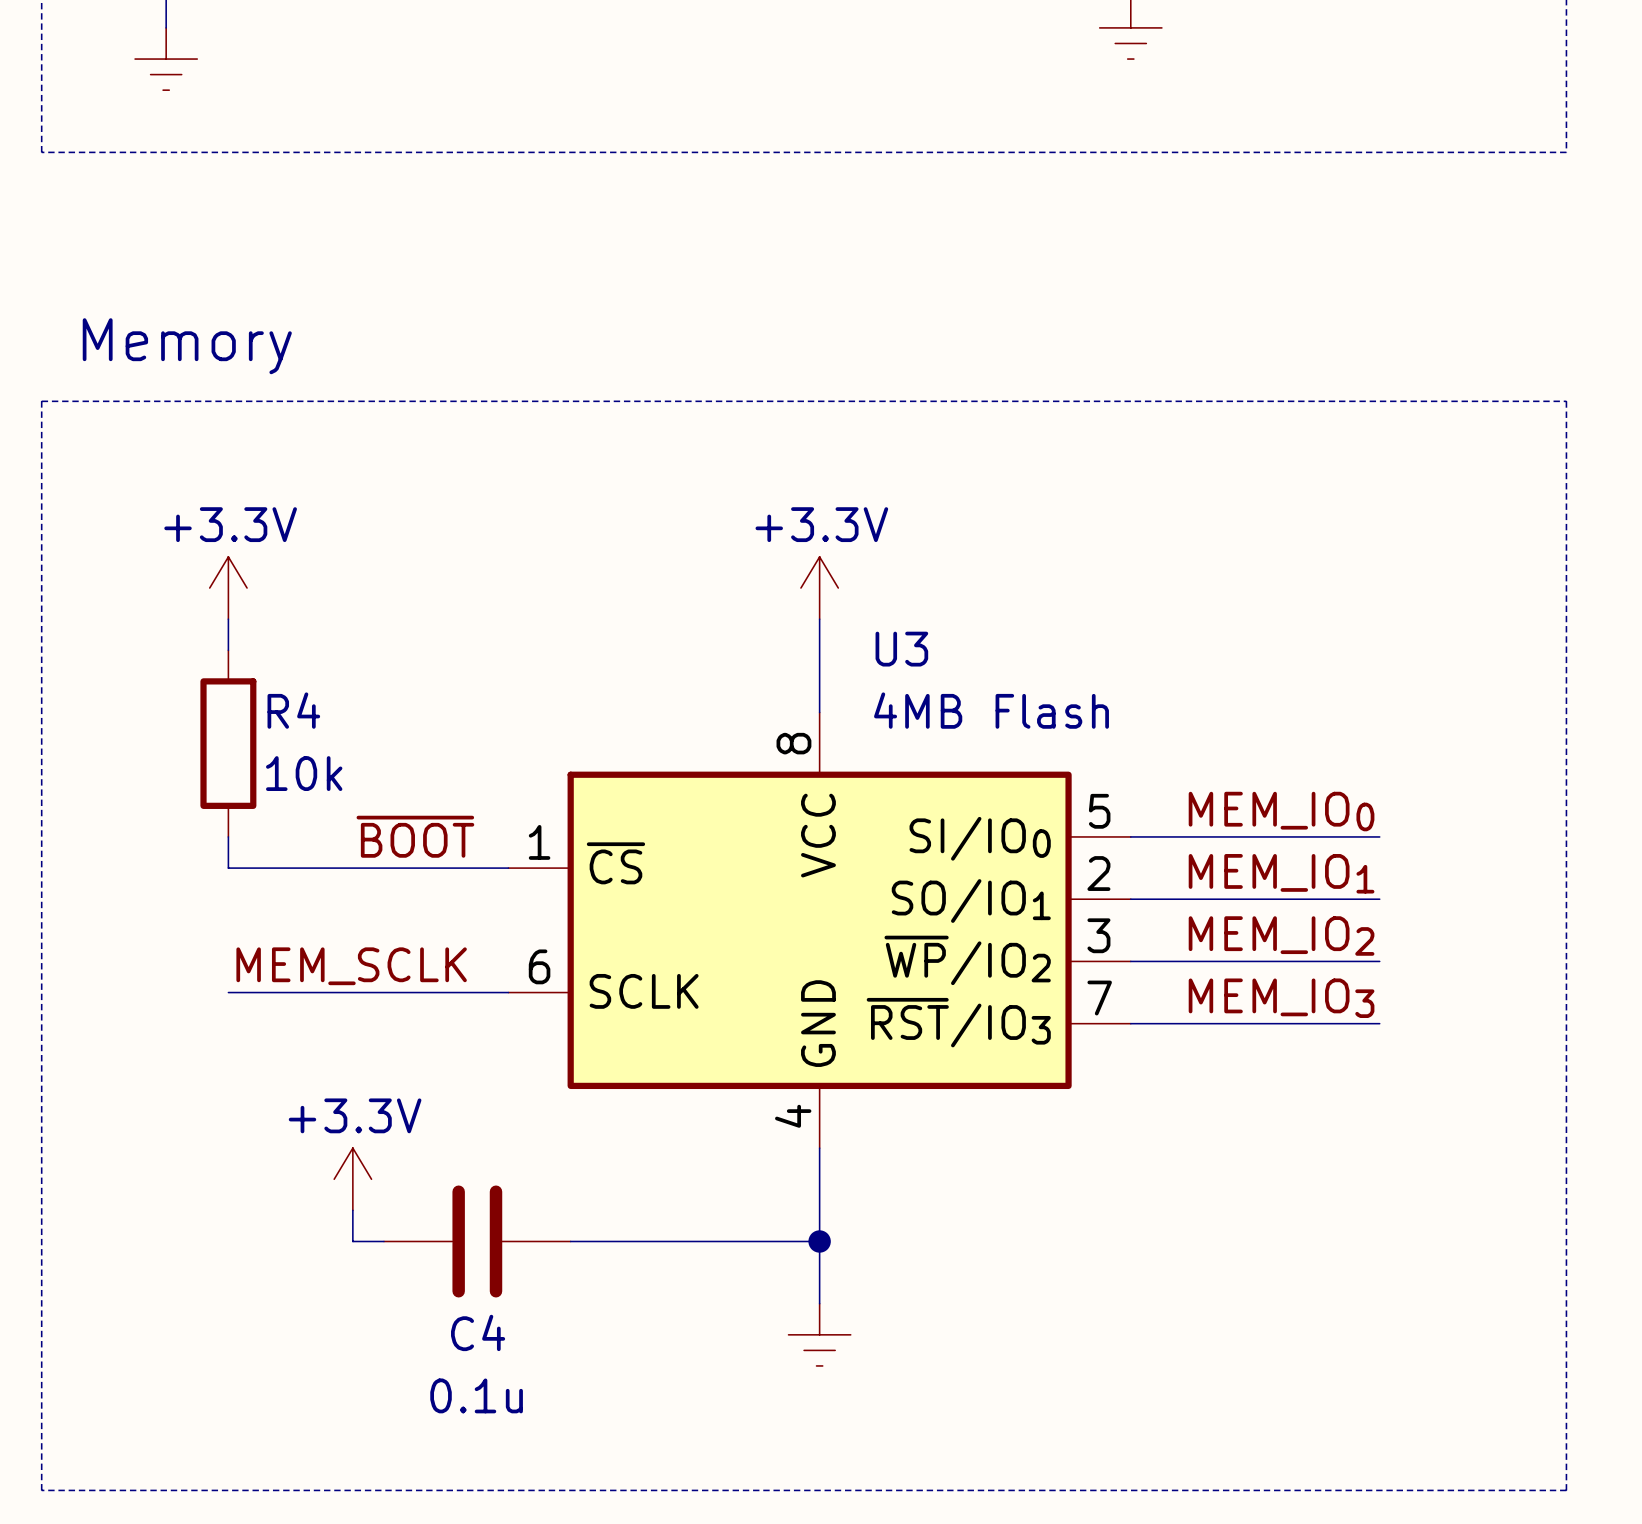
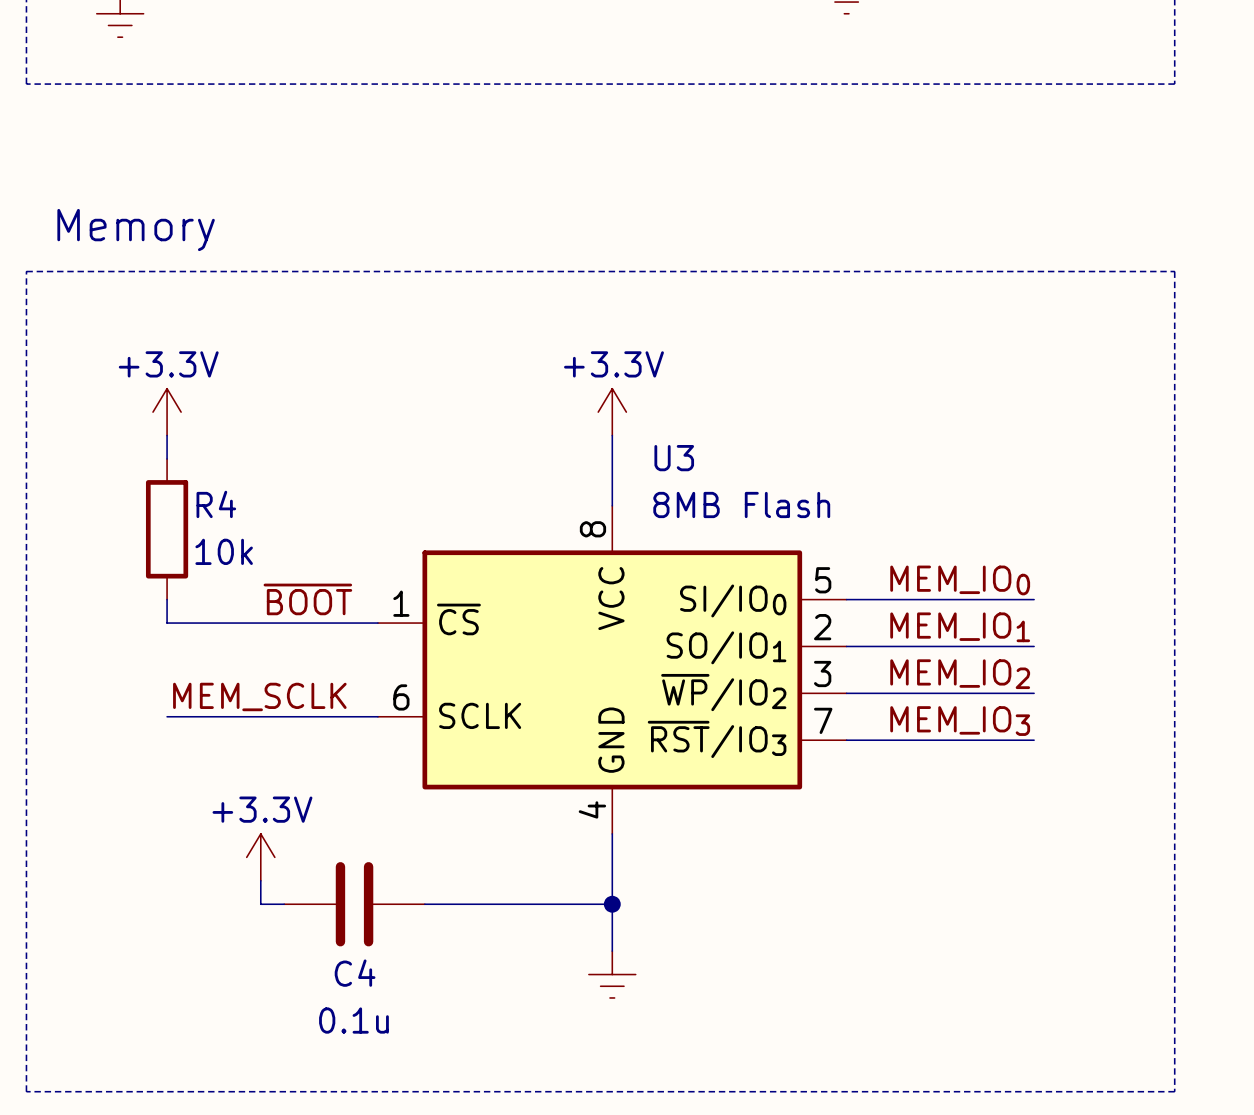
U3 value: 4MB Flash (991, 710) -> 8MB Flash (741, 504)

